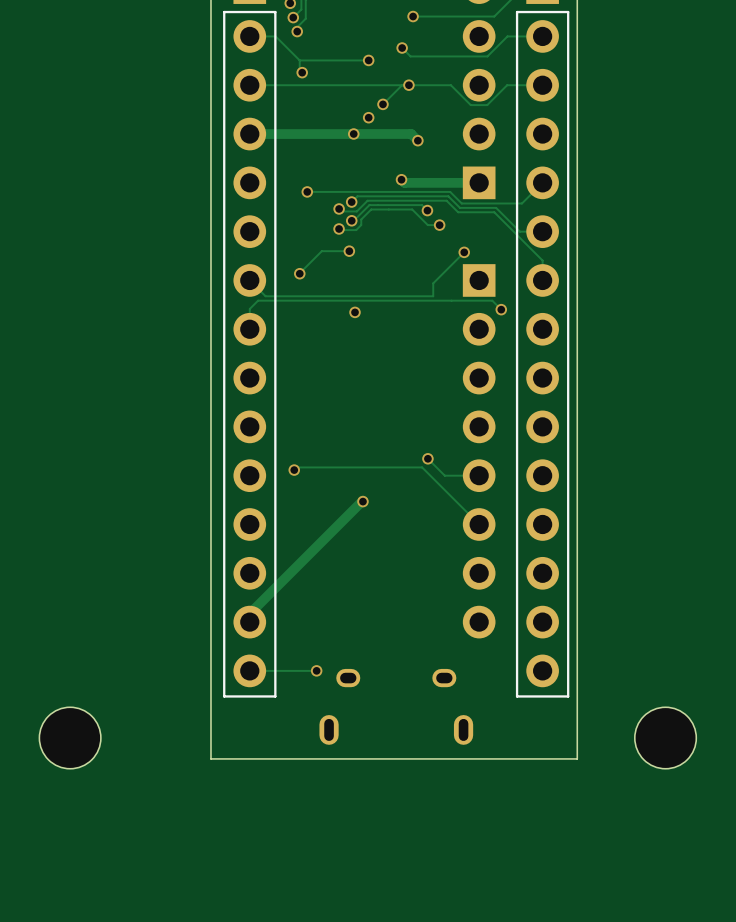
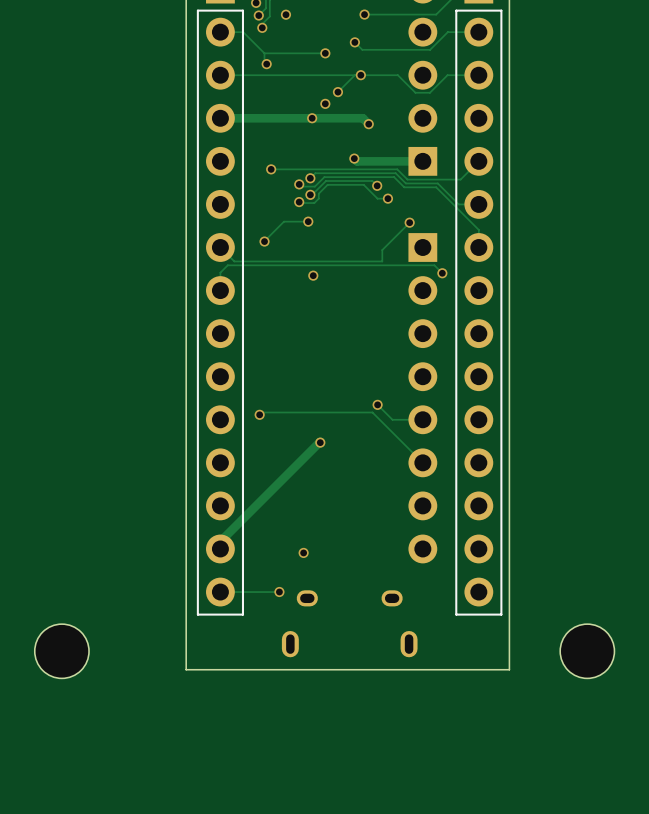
via: none -> (285, 14)
via: none -> (303, 552)

